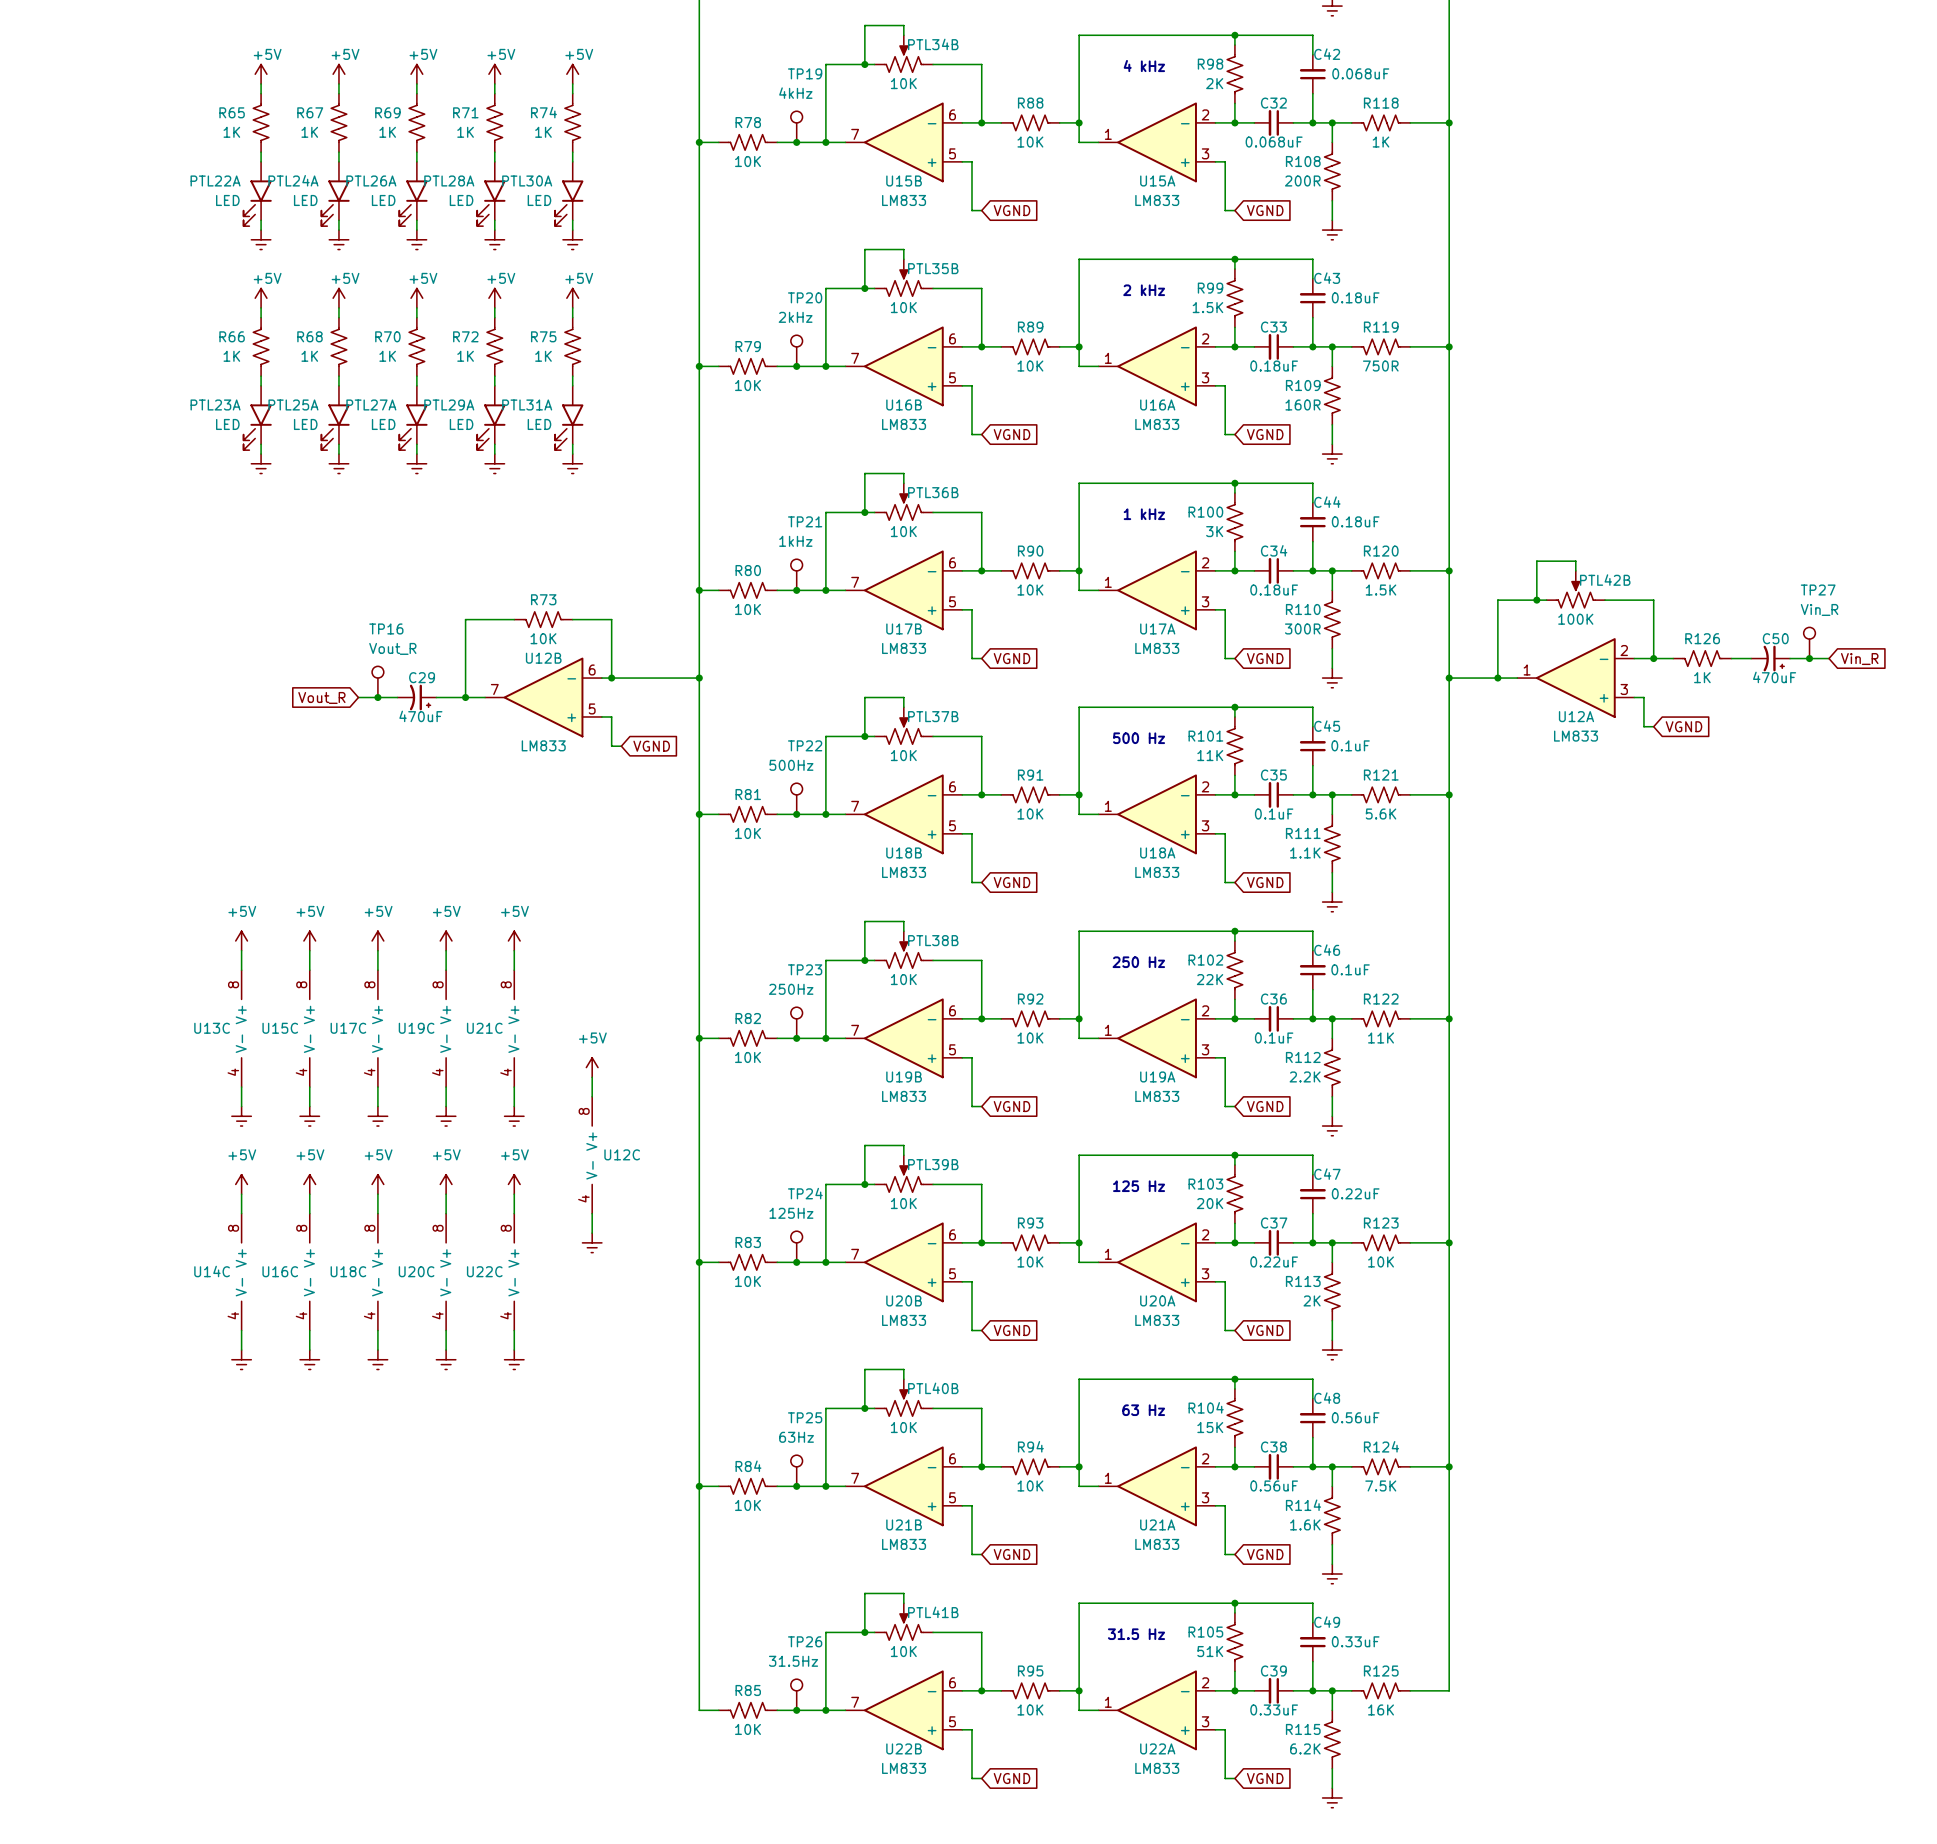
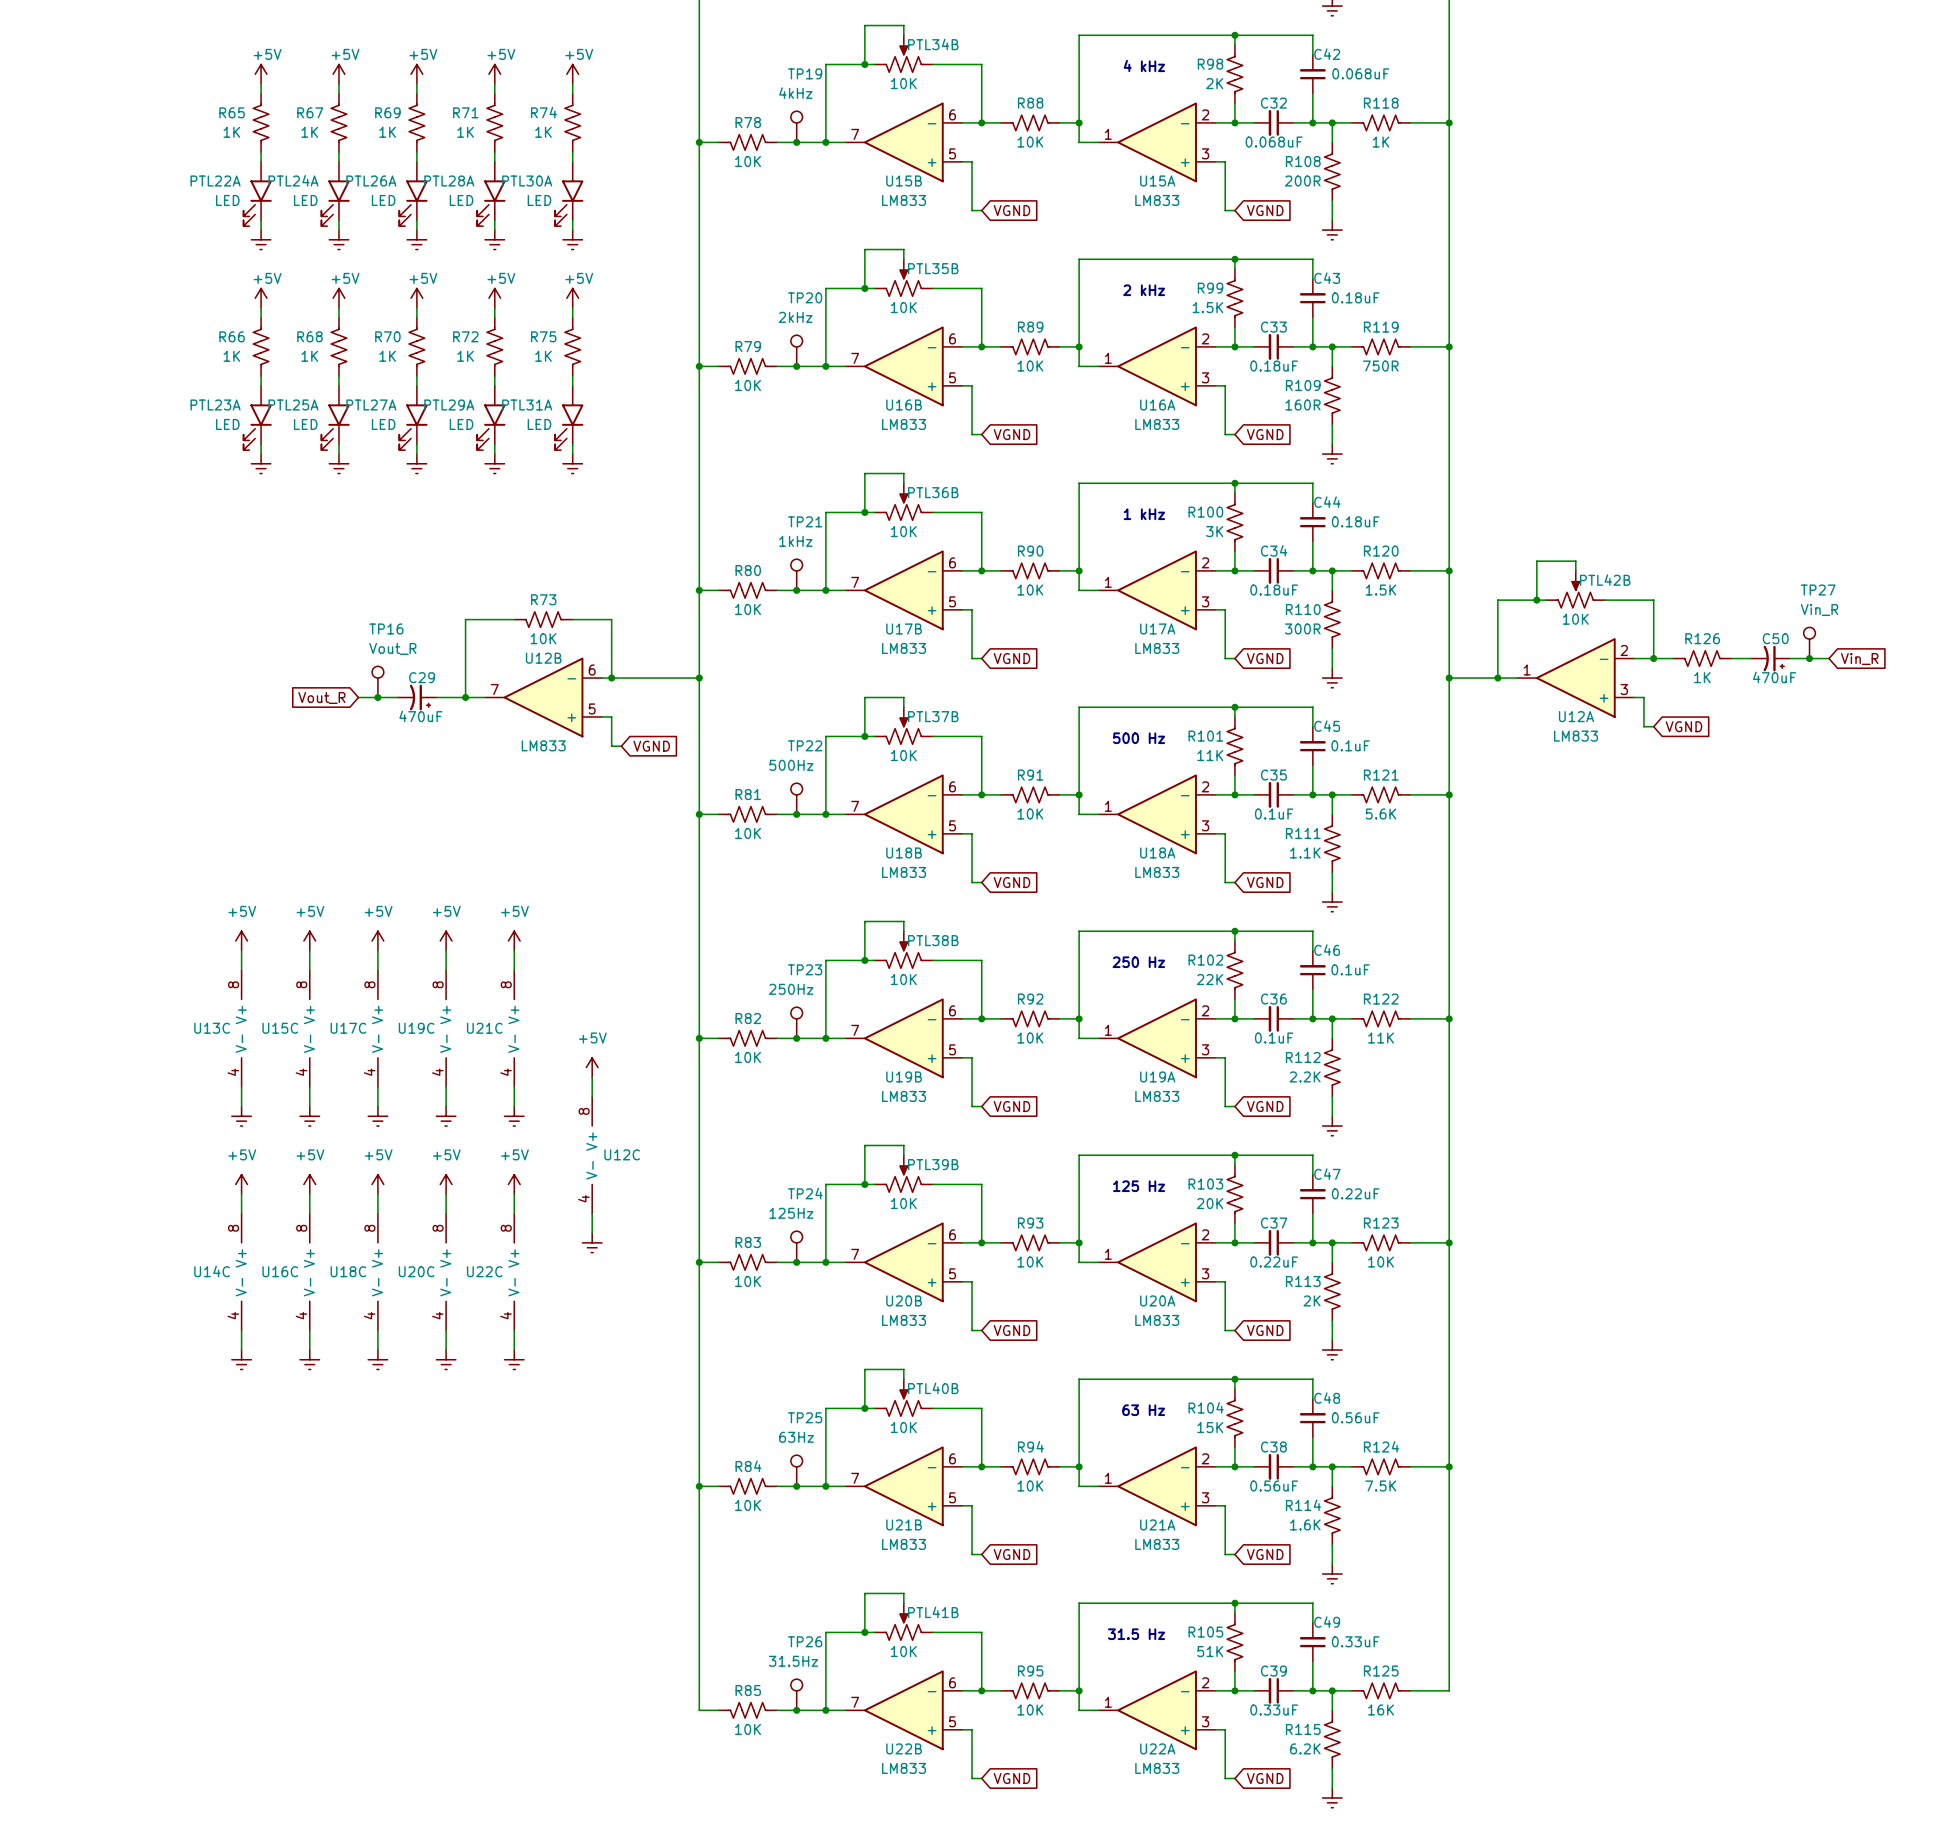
PTL42B value: 100K (1575, 619) -> 10K (1575, 619)

